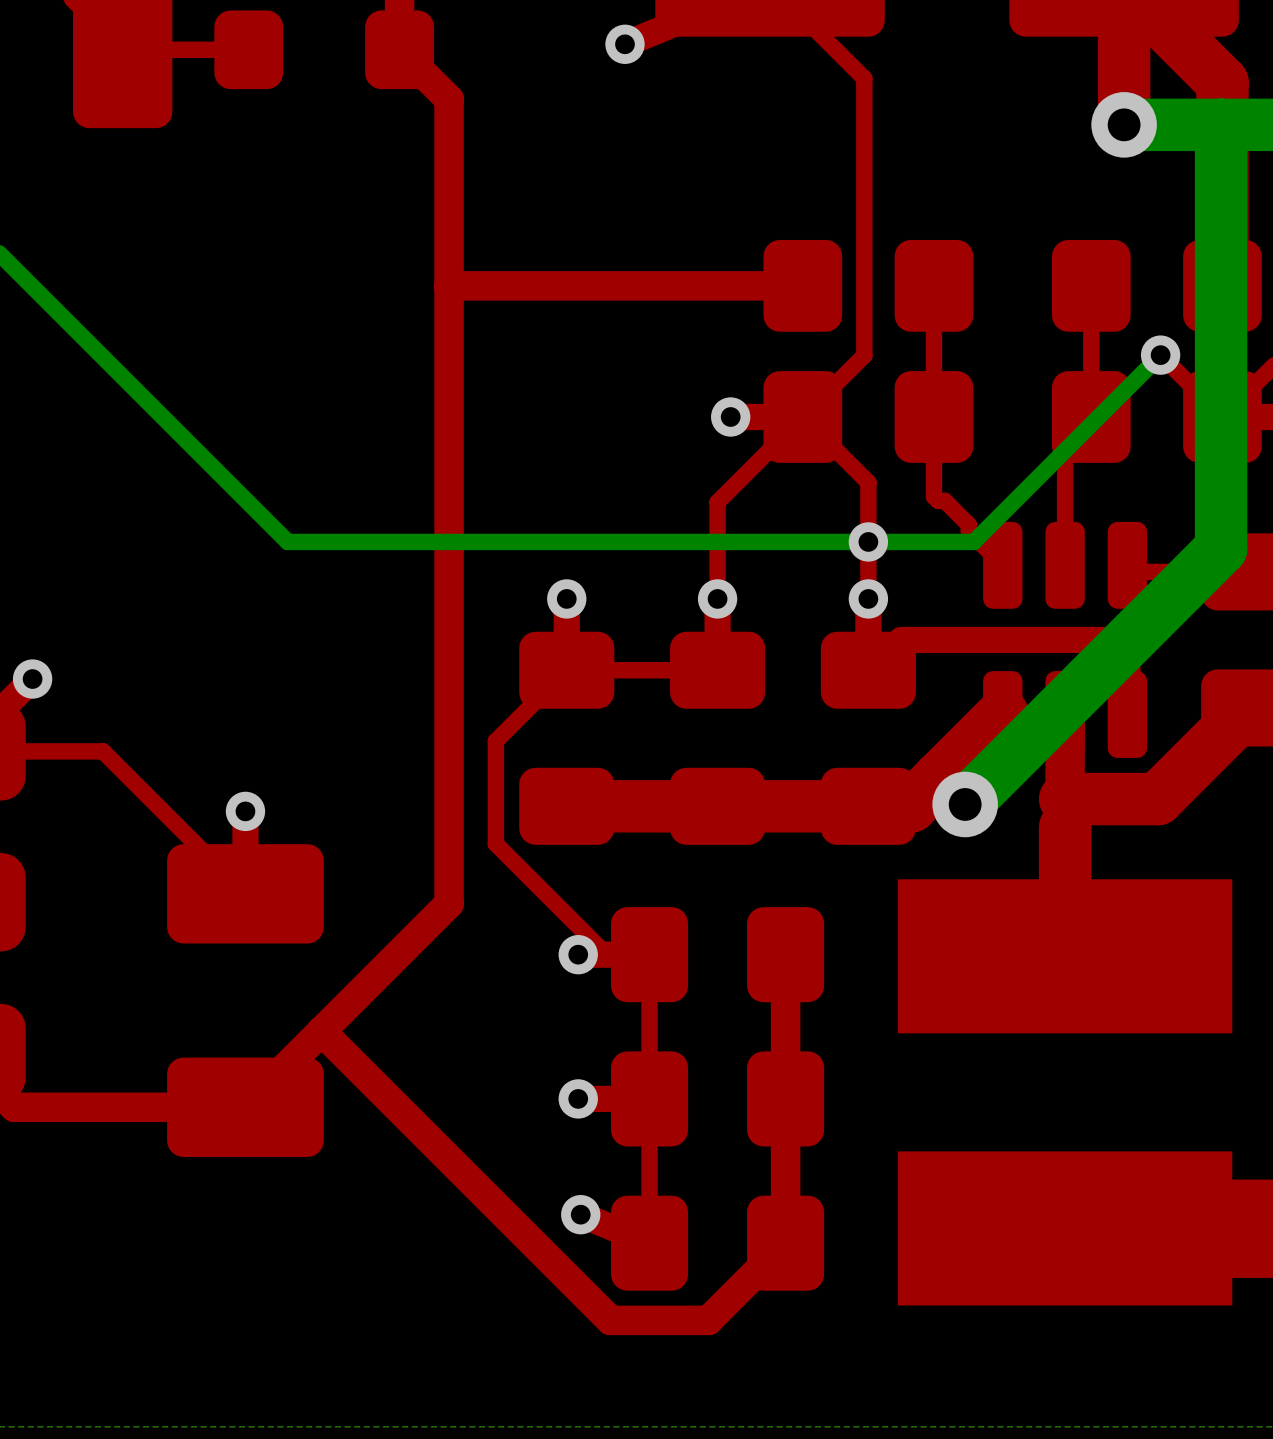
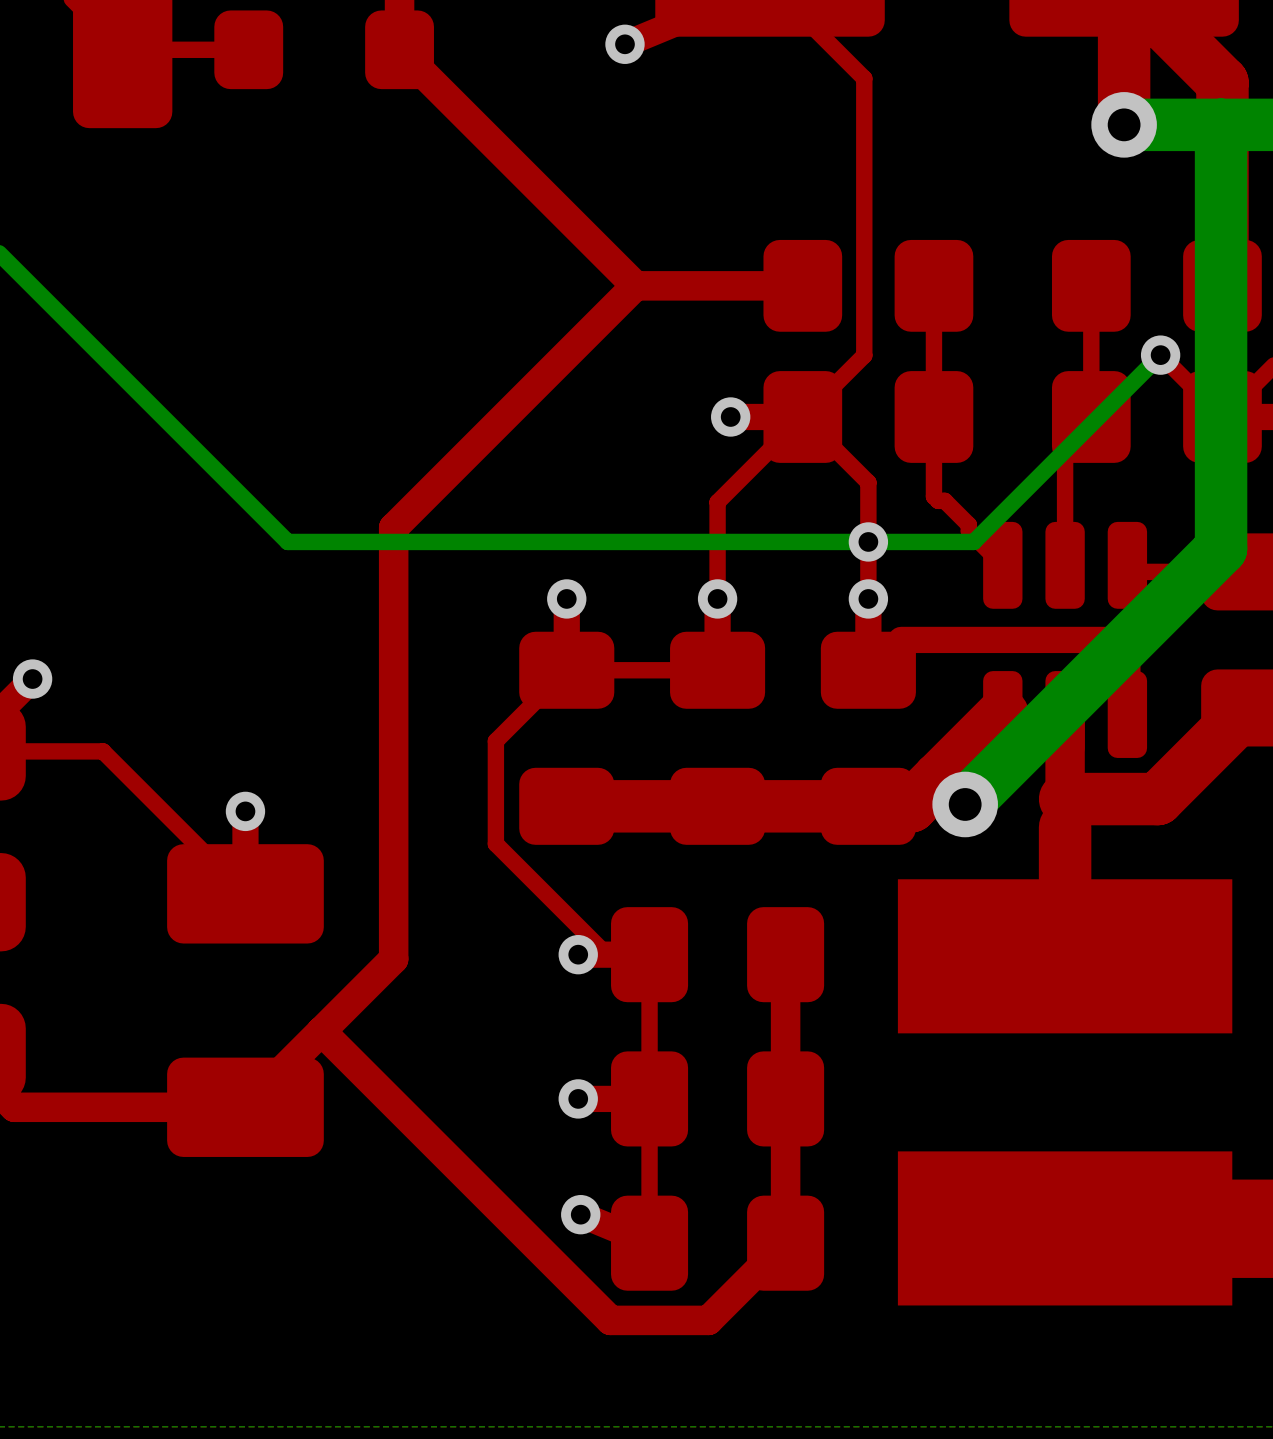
top track: (449, 99) (449, 903) (393, 959) -> (449, 99) (635, 285) (393, 527) (393, 959)
top track: (635, 285) (449, 285) -> none

